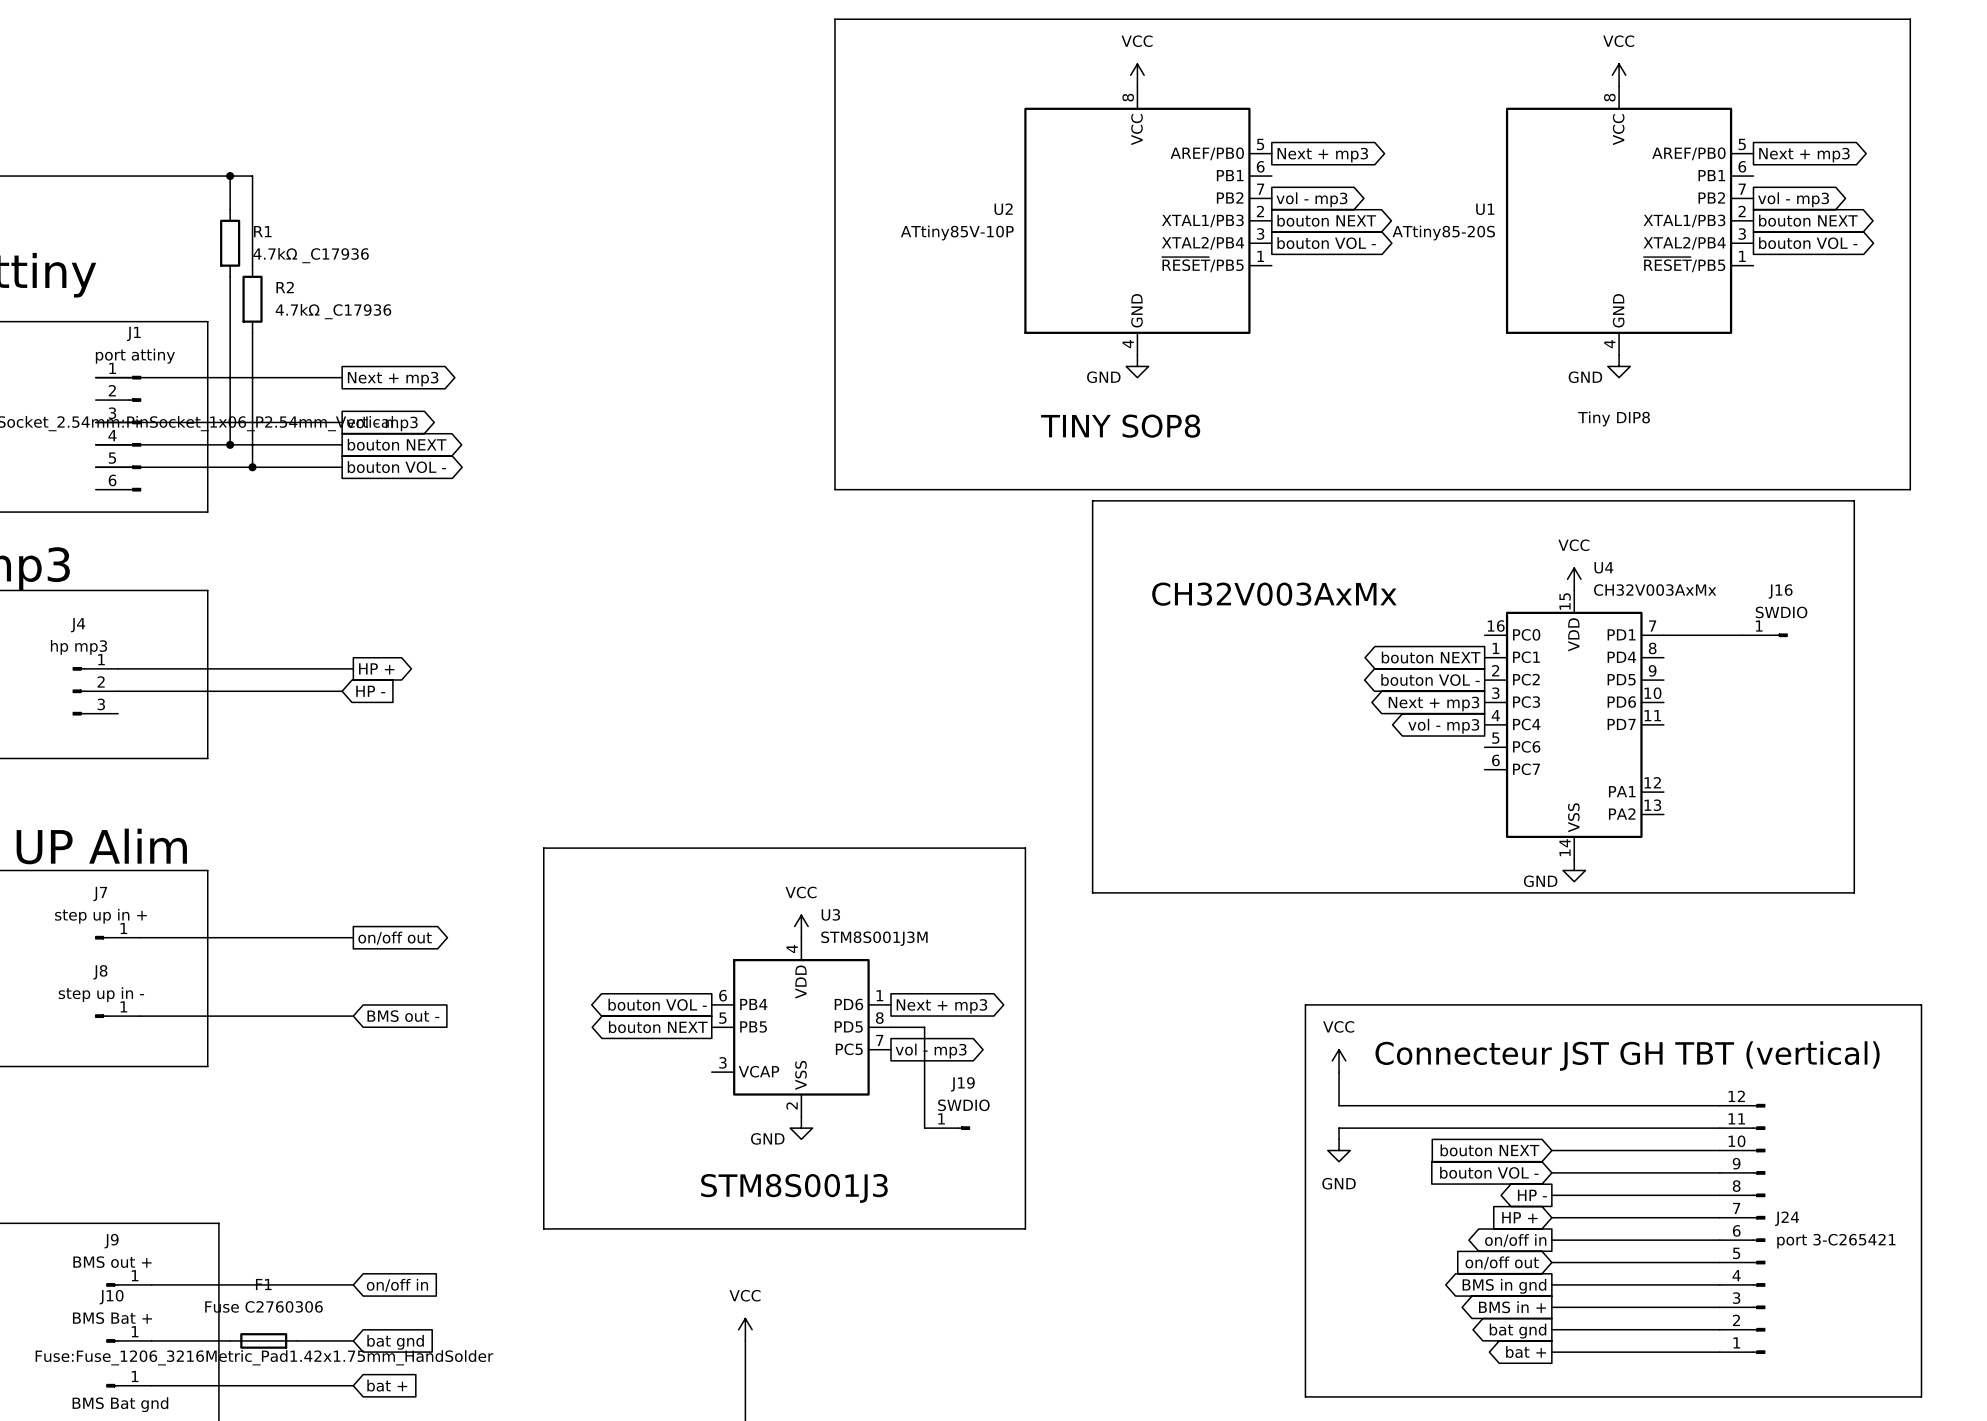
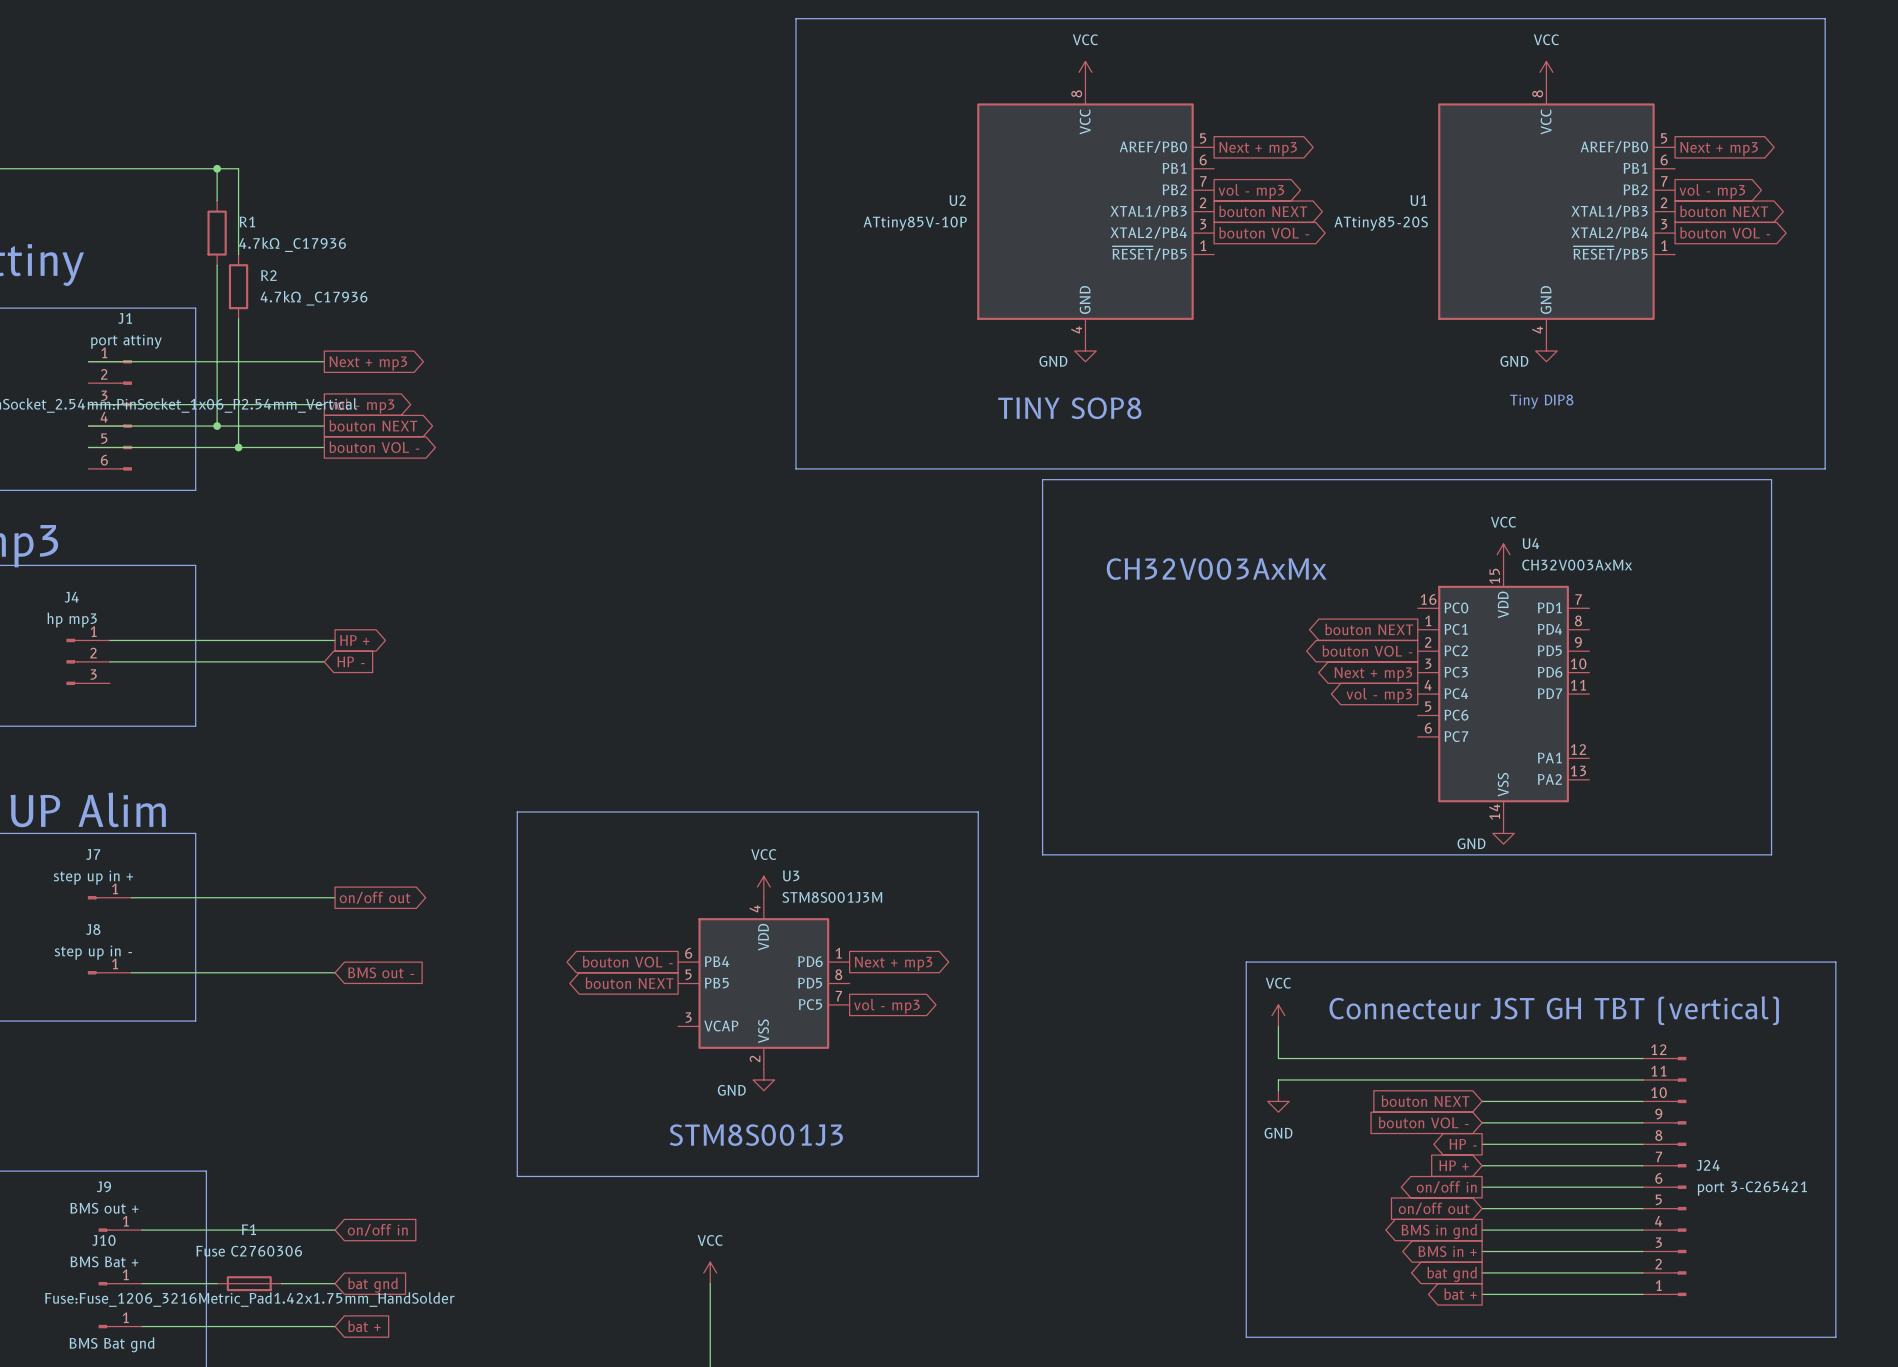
wire: (1663, 635) (1742, 635) -> none
J16: SWDIO (1765, 635) -> none
wire: (890, 1027) (924, 1027) (924, 1128) -> none
J19: SWDIO (947, 1128) -> none

